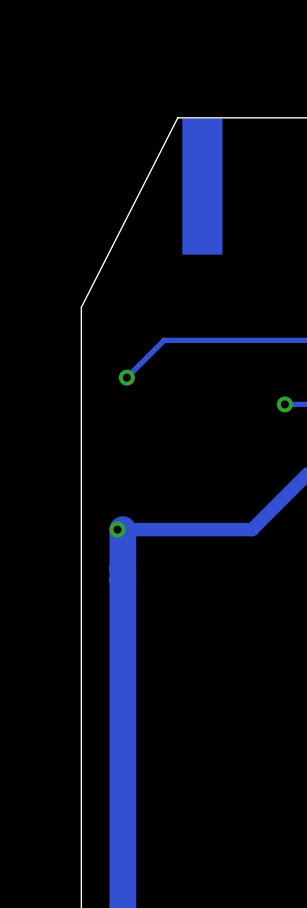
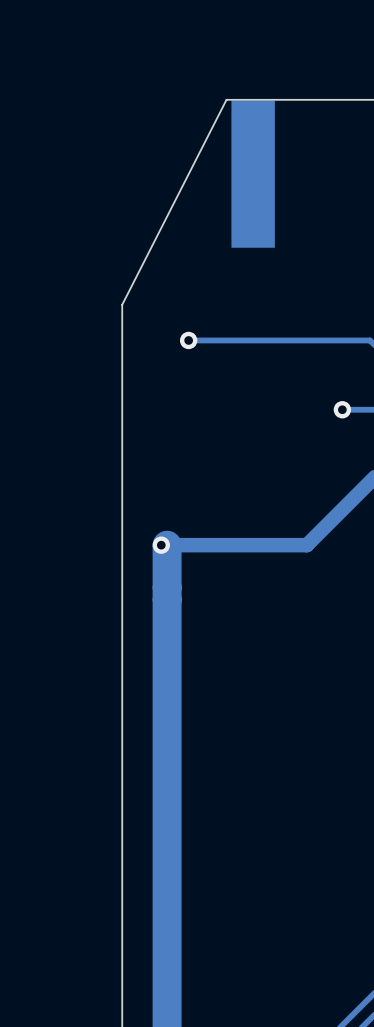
track: (164, 340) (126, 377) -> (211, 340) (188, 340)
via position: (126, 377) -> (188, 340)

